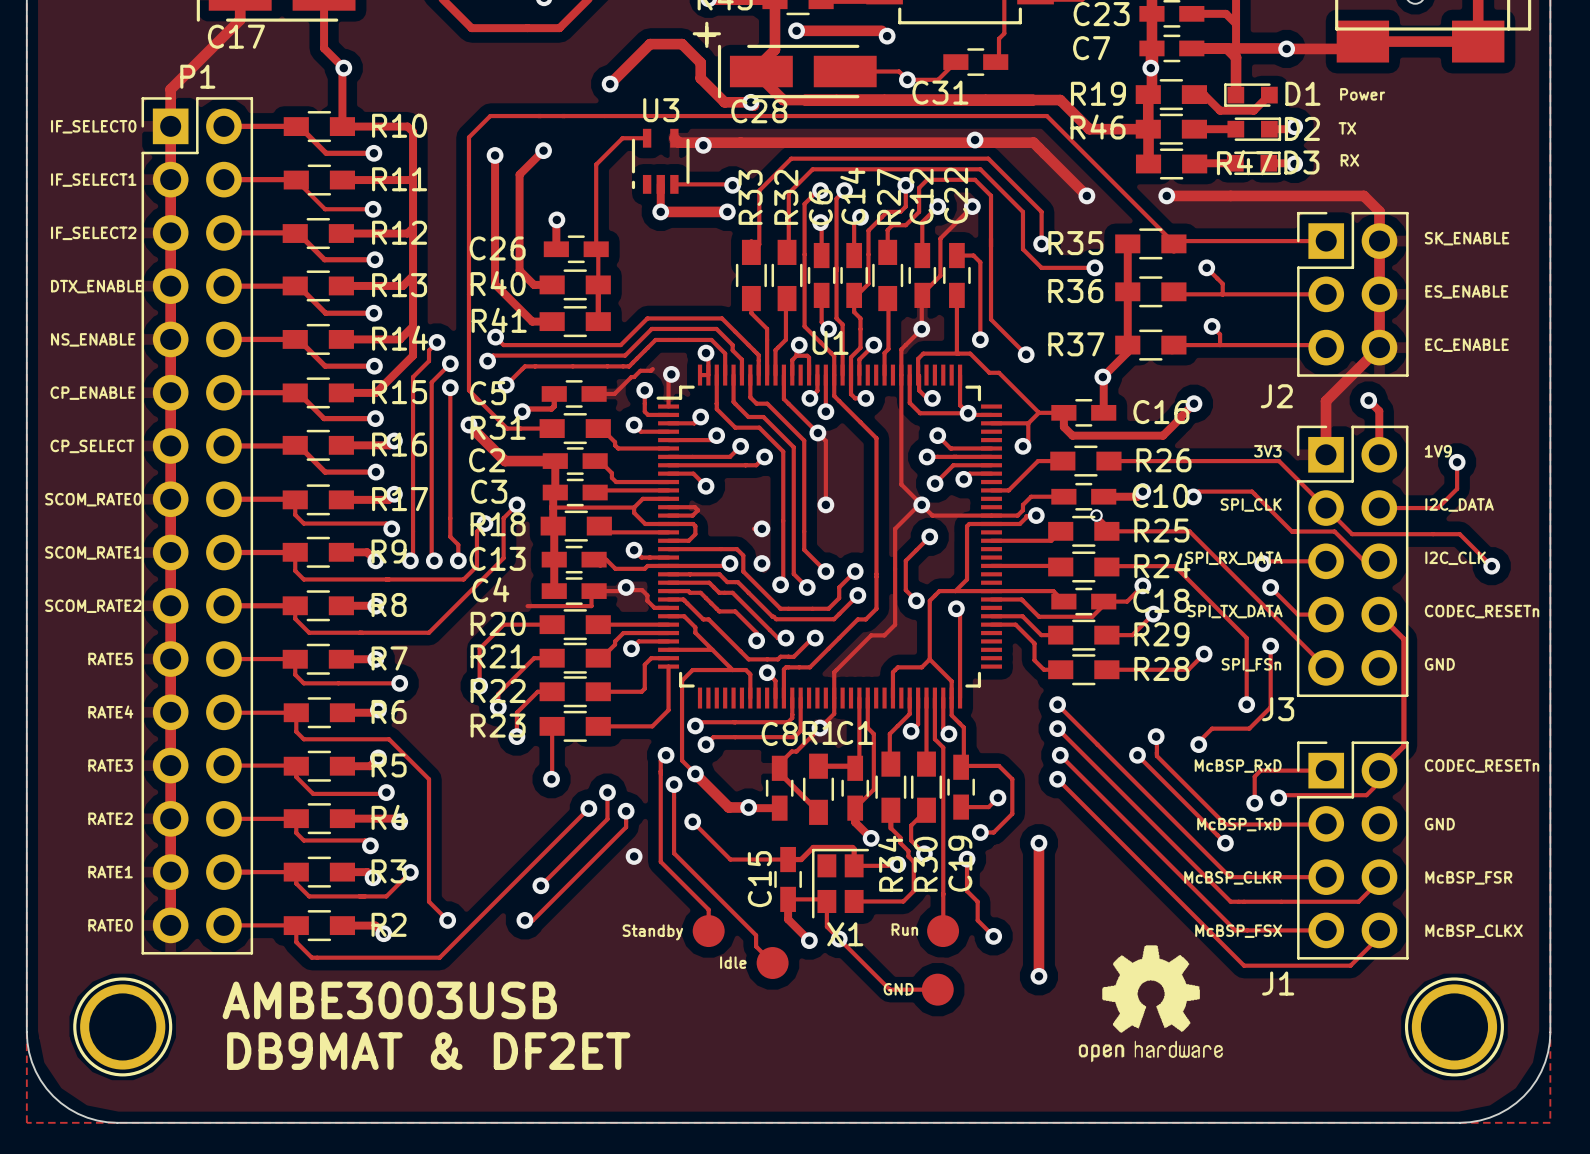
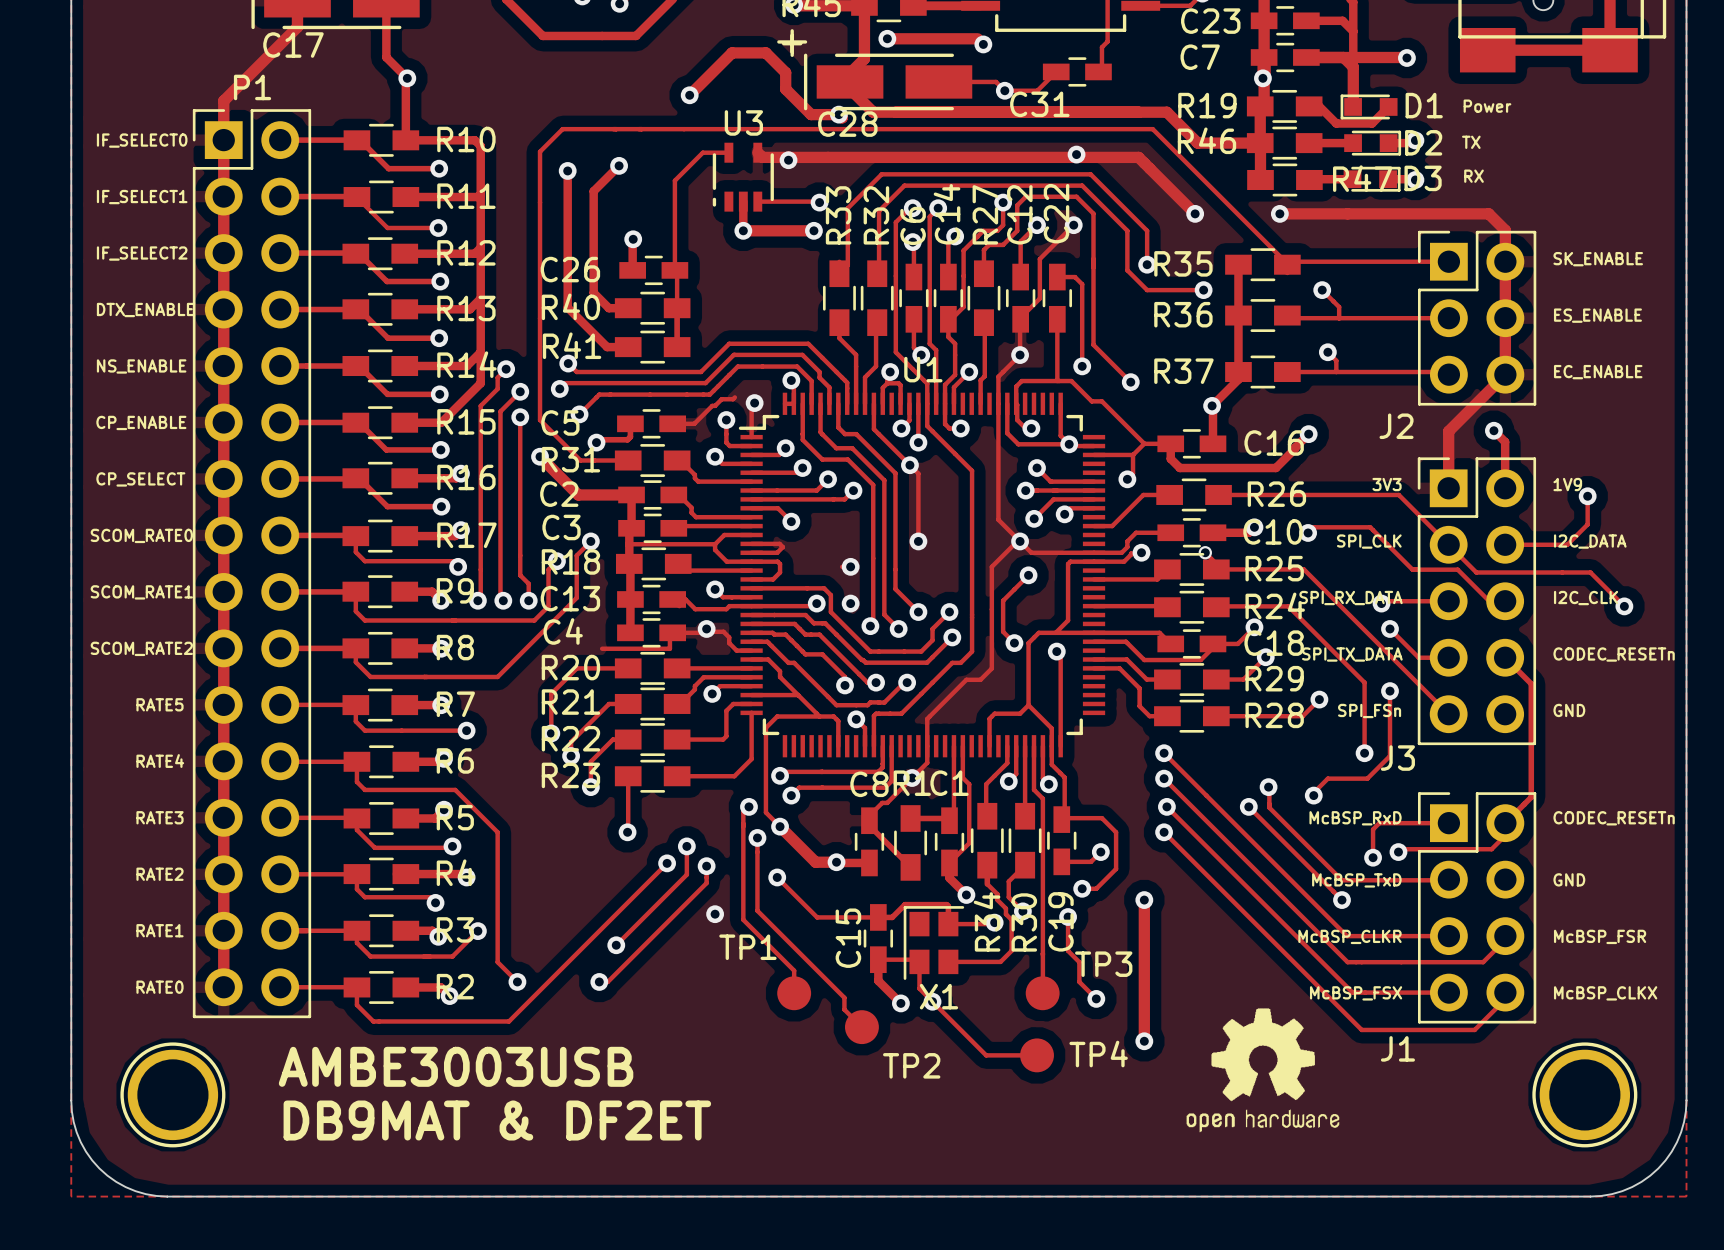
track: (1362, 41) (1355, 48) (1286, 48) -> none
TP1 name: none -> TP1 (747, 947)
TP3 name: none -> TP3 (1103, 964)
text: Run (904, 929) -> none
text: Standby (652, 932) -> none
text: Idle (733, 962) -> none
TP4 name: none -> TP4 (1098, 1054)
text: GND (898, 989) -> none
TP2 name: none -> TP2 (911, 1065)

